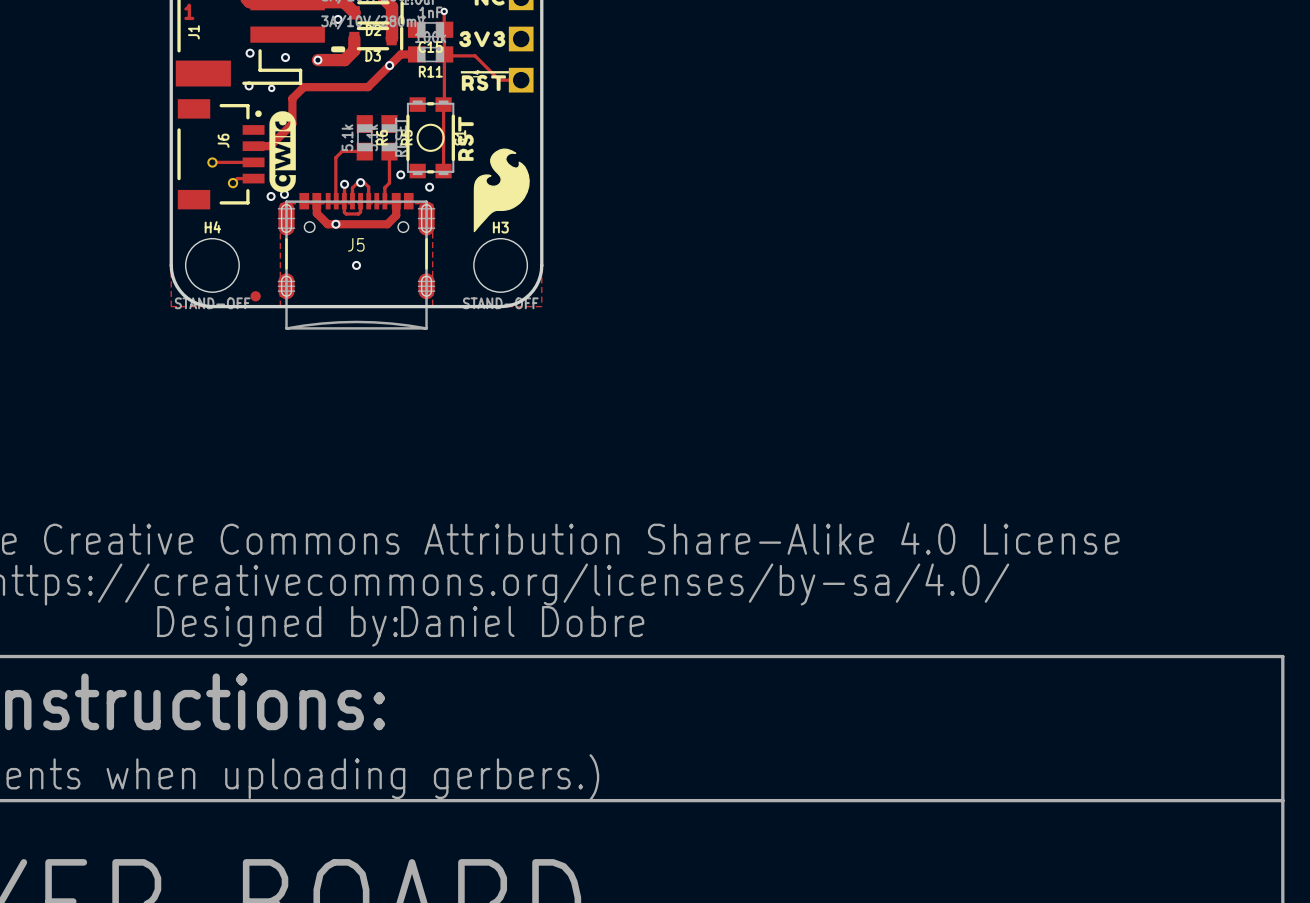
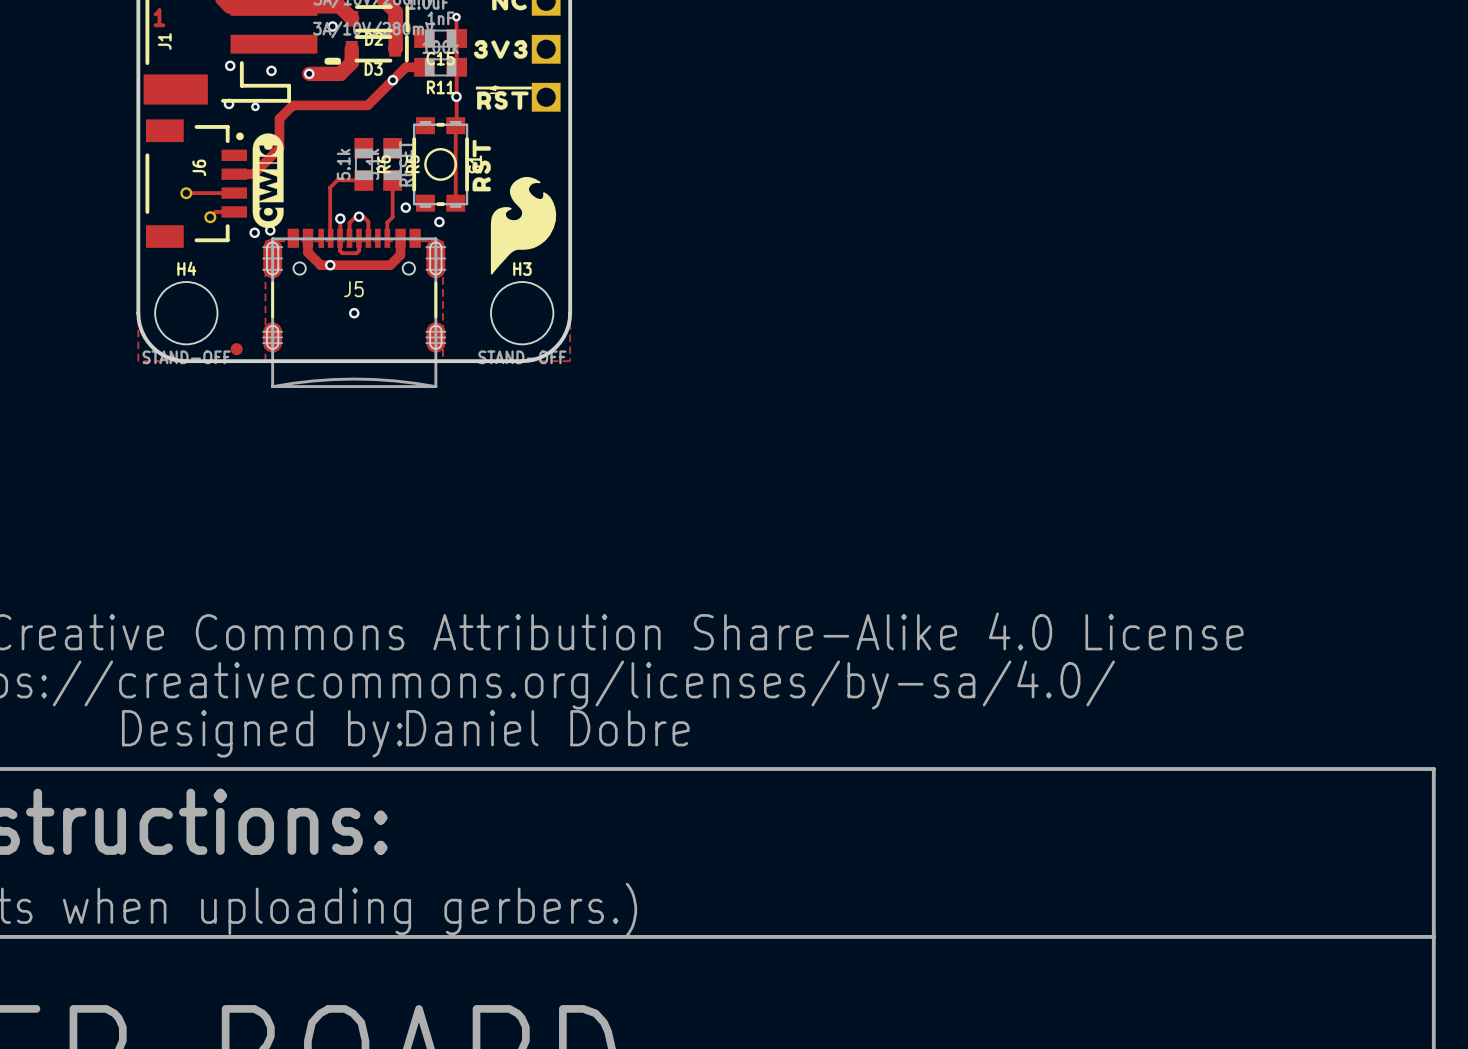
track: (445, 55) (475, 55) (499, 80) (521, 80) -> none
via: none -> (456, 96)

